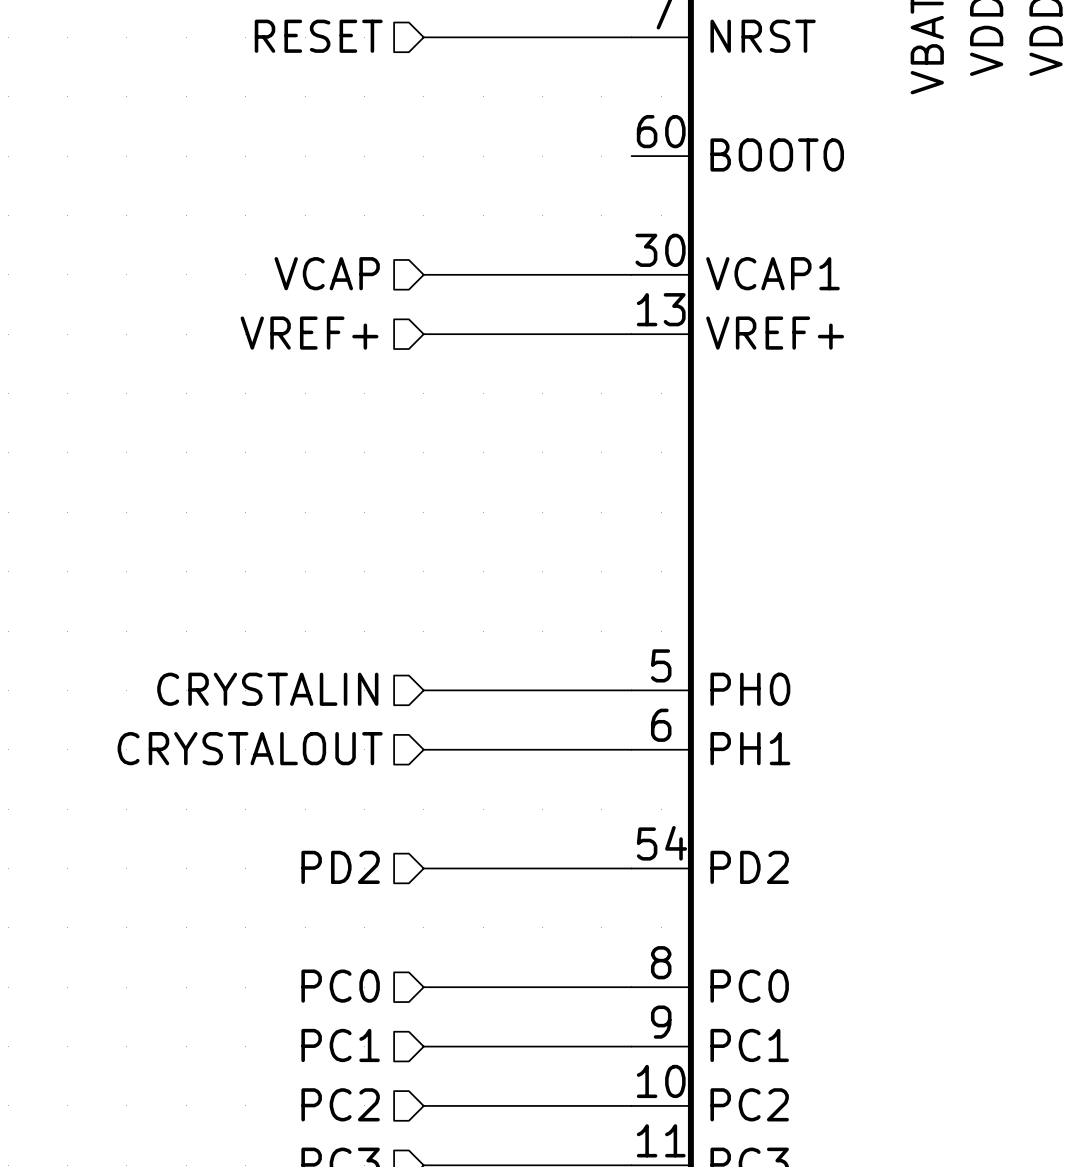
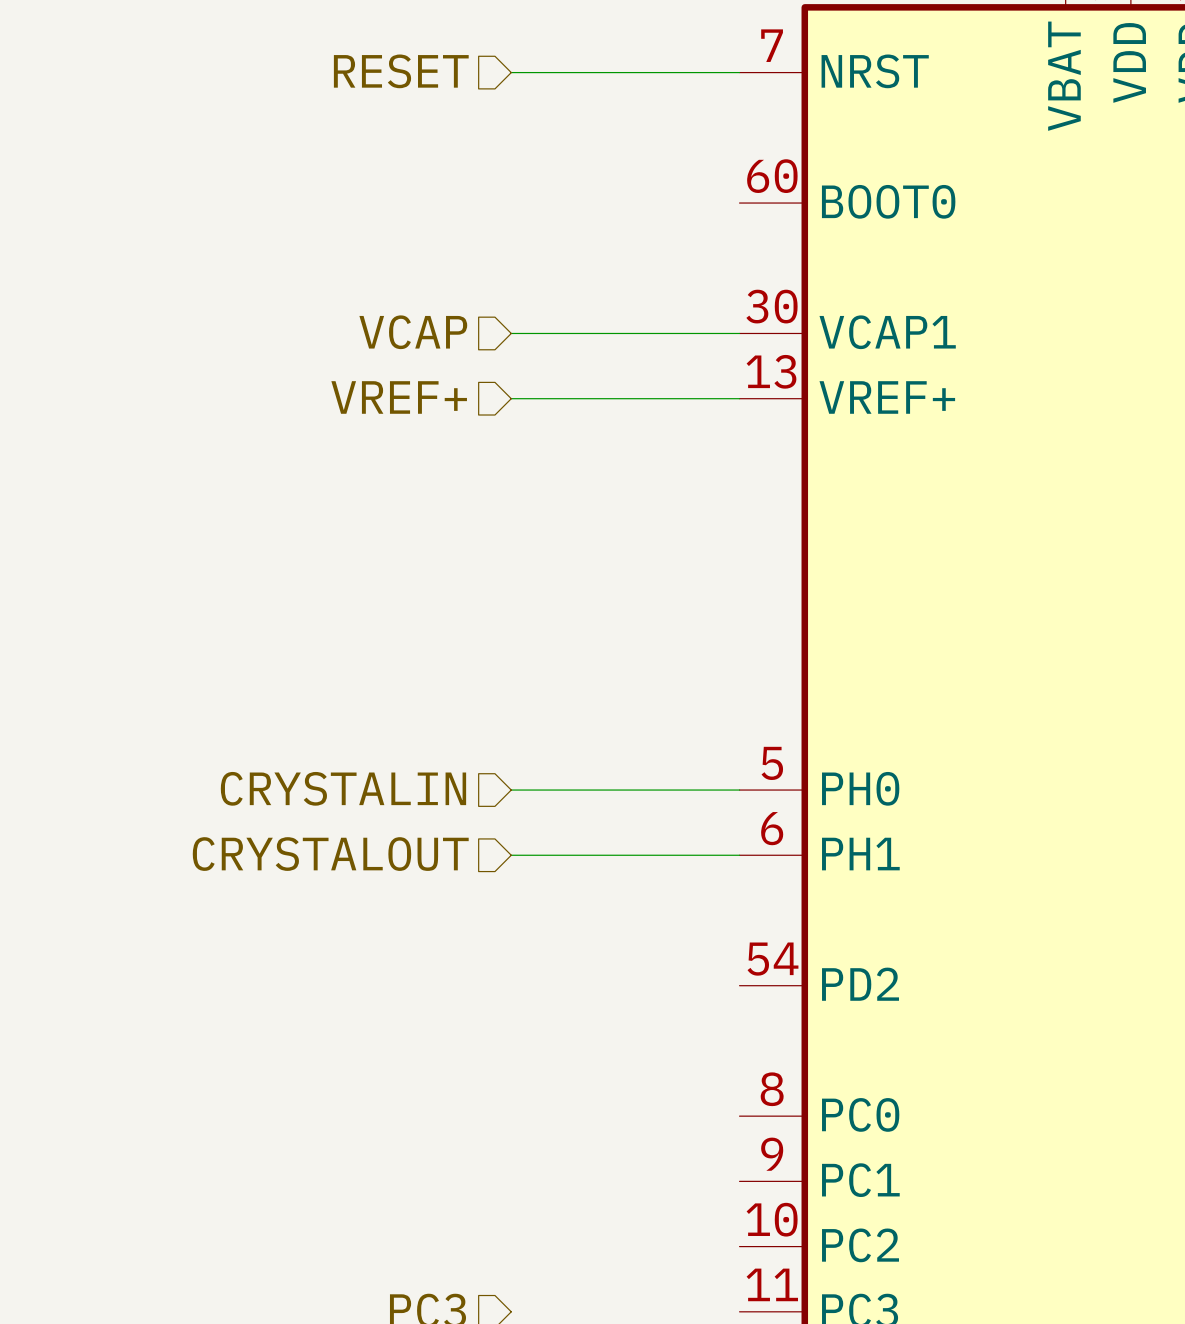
hierarchical label: PD2 (340, 867) -> none
wire: (423, 868) (631, 868) -> none
hierarchical label: PC0 (340, 986) -> none
wire: (423, 987) (631, 987) -> none
hierarchical label: PC1 (340, 1045) -> none
wire: (423, 1046) (631, 1046) -> none
hierarchical label: PC2 (340, 1104) -> none
wire: (423, 1105) (631, 1105) -> none
wire: (423, 1165) (631, 1165) -> none

